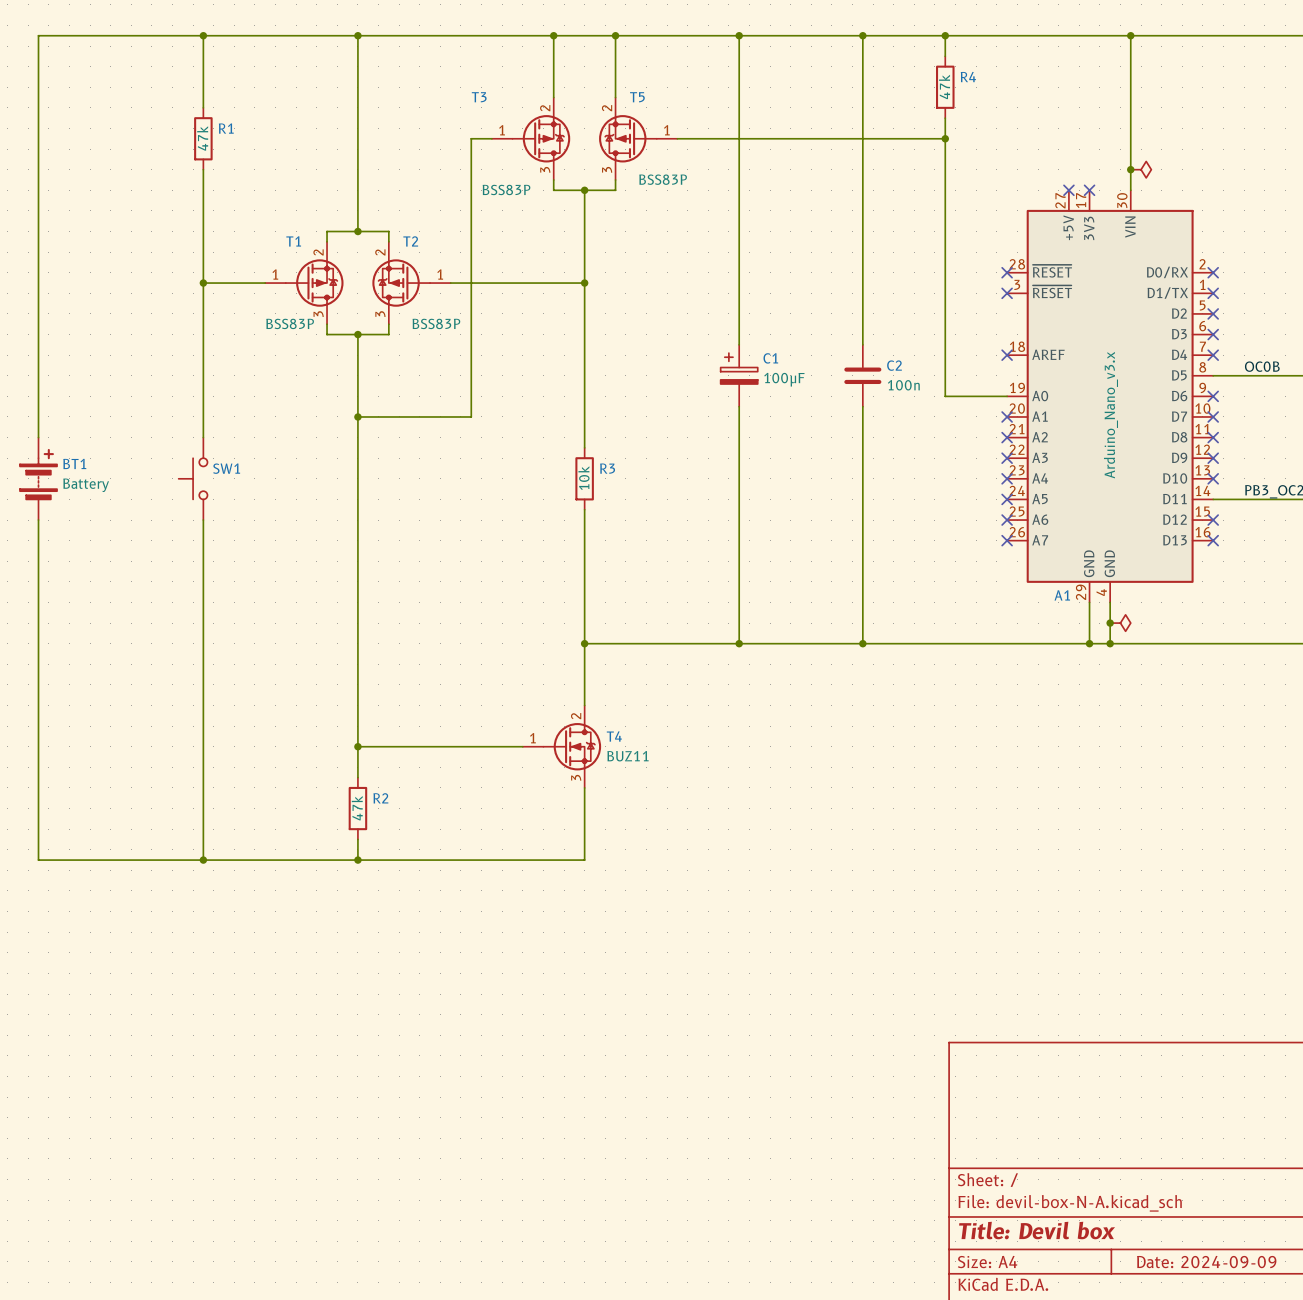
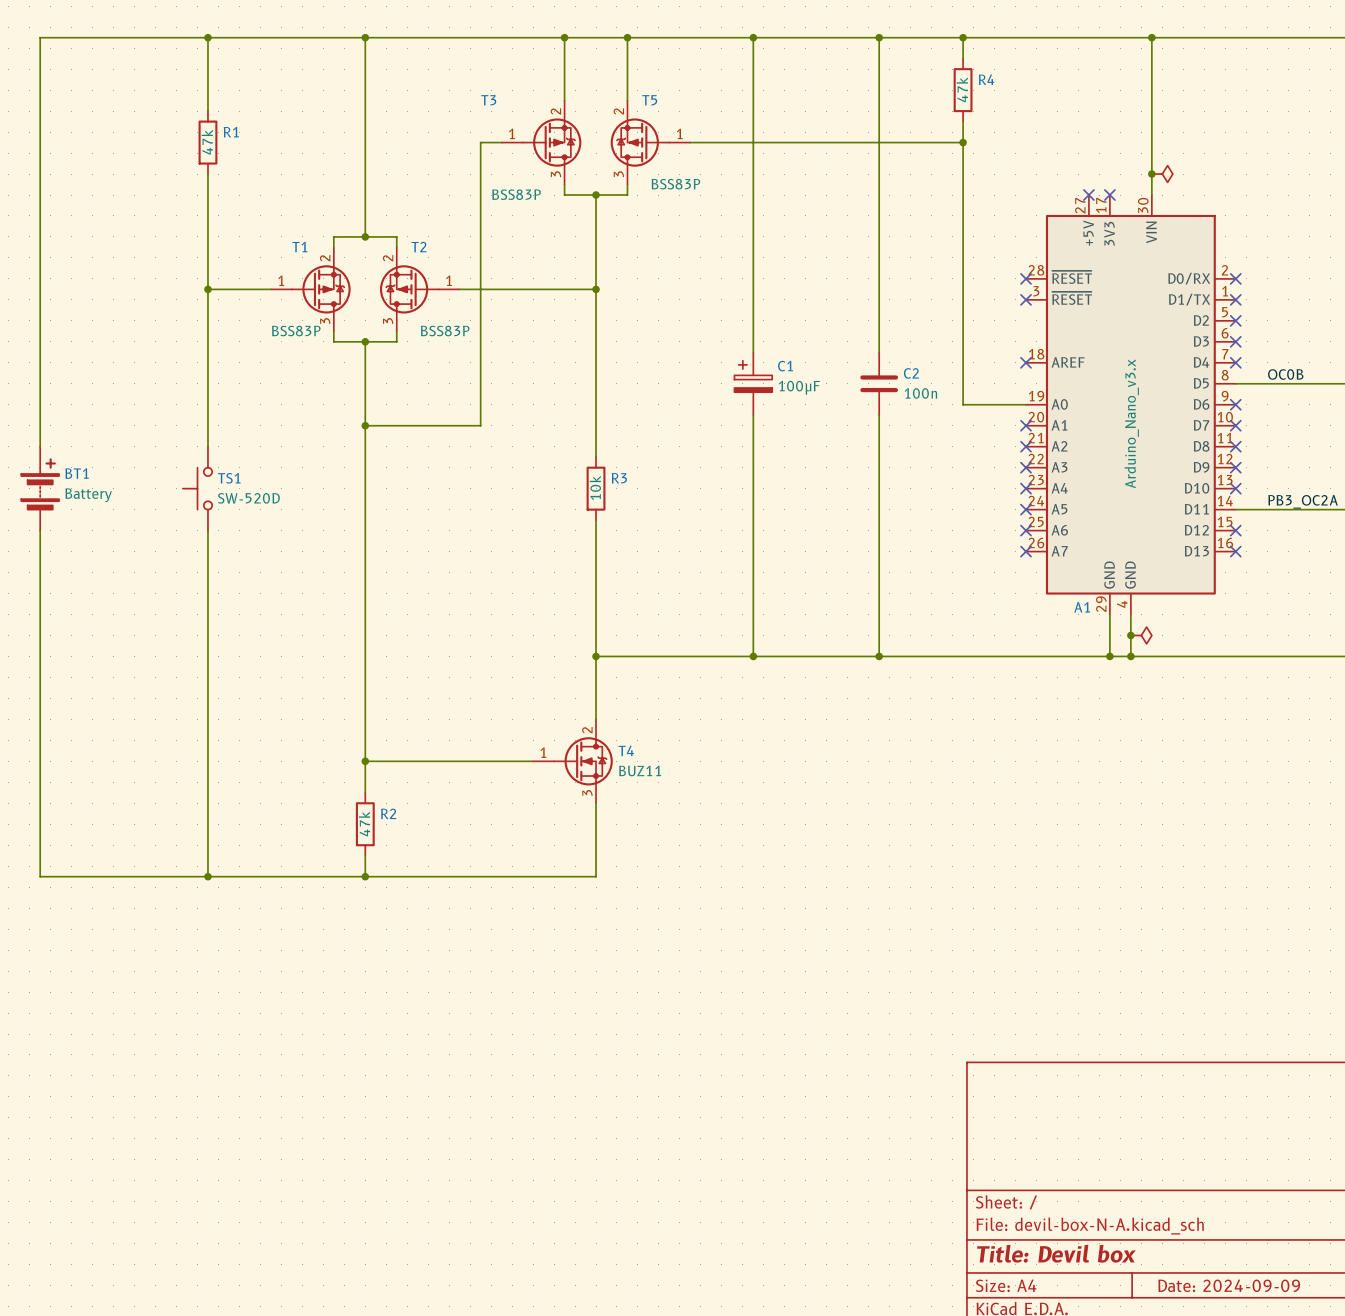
SW1 name: SW1 (226, 468) -> TS1 (229, 478)
SW1 value: none -> SW-520D (248, 498)

